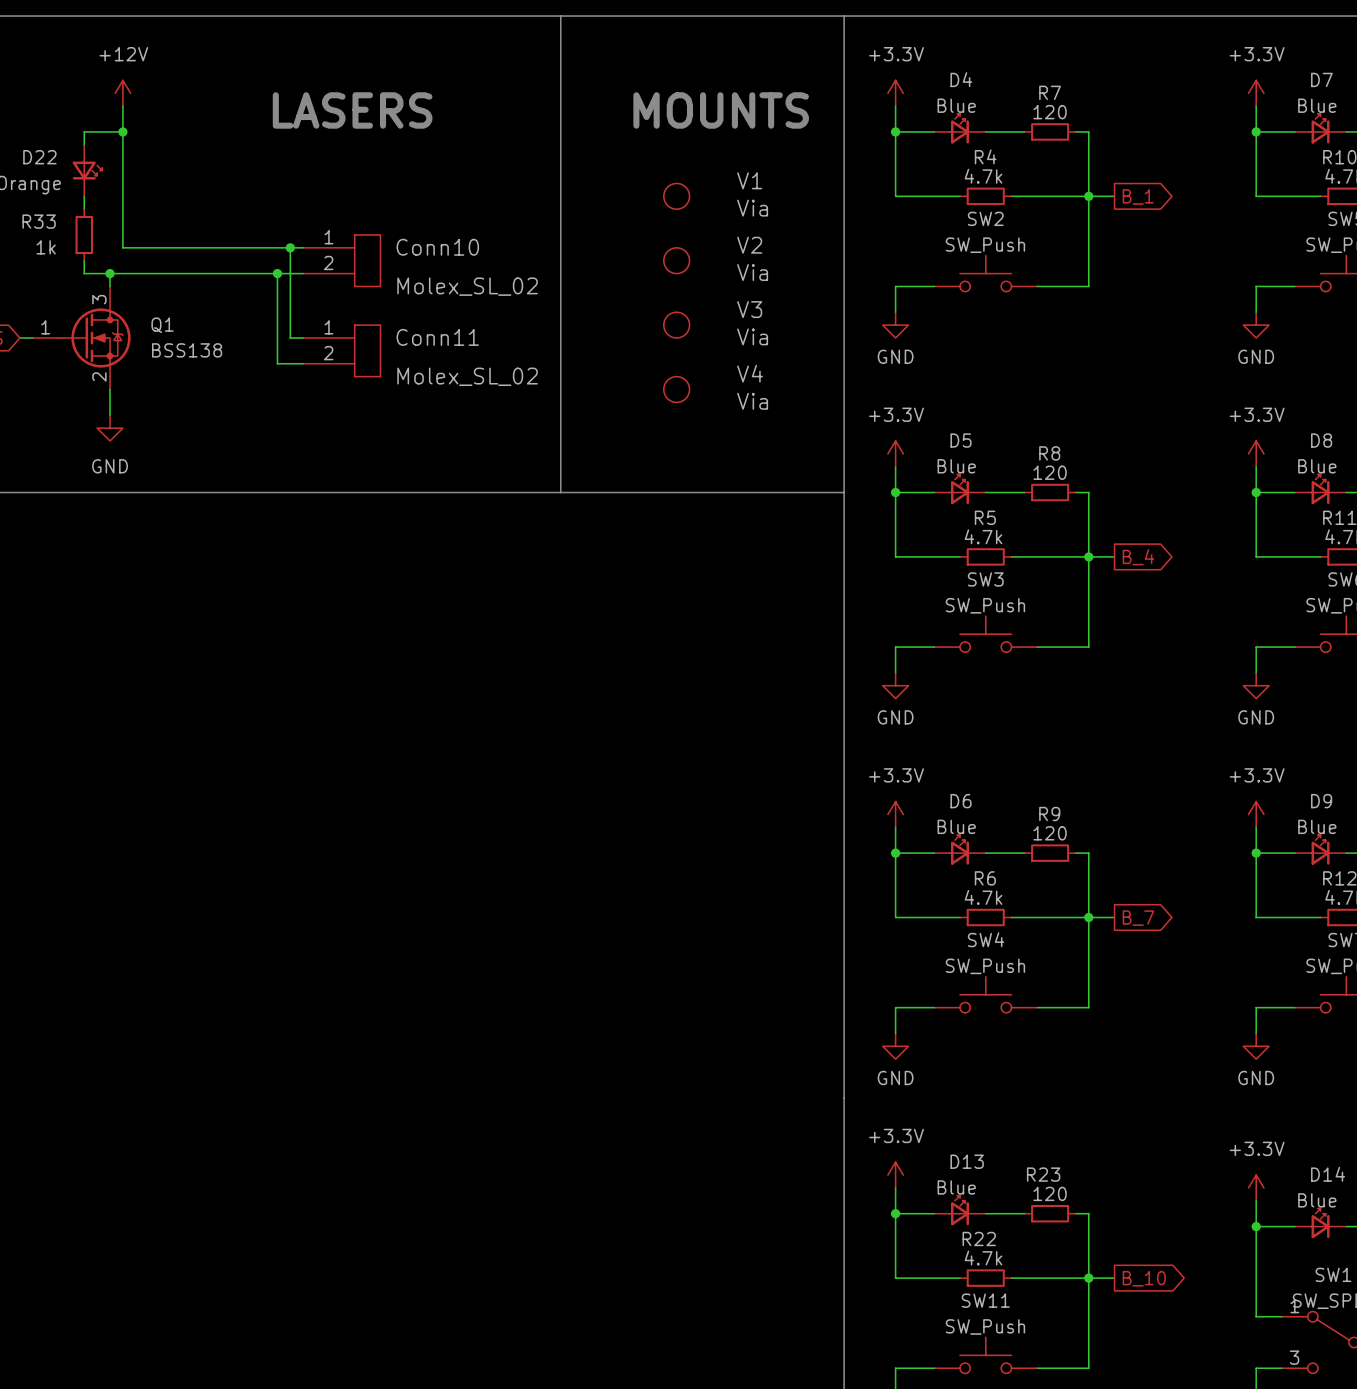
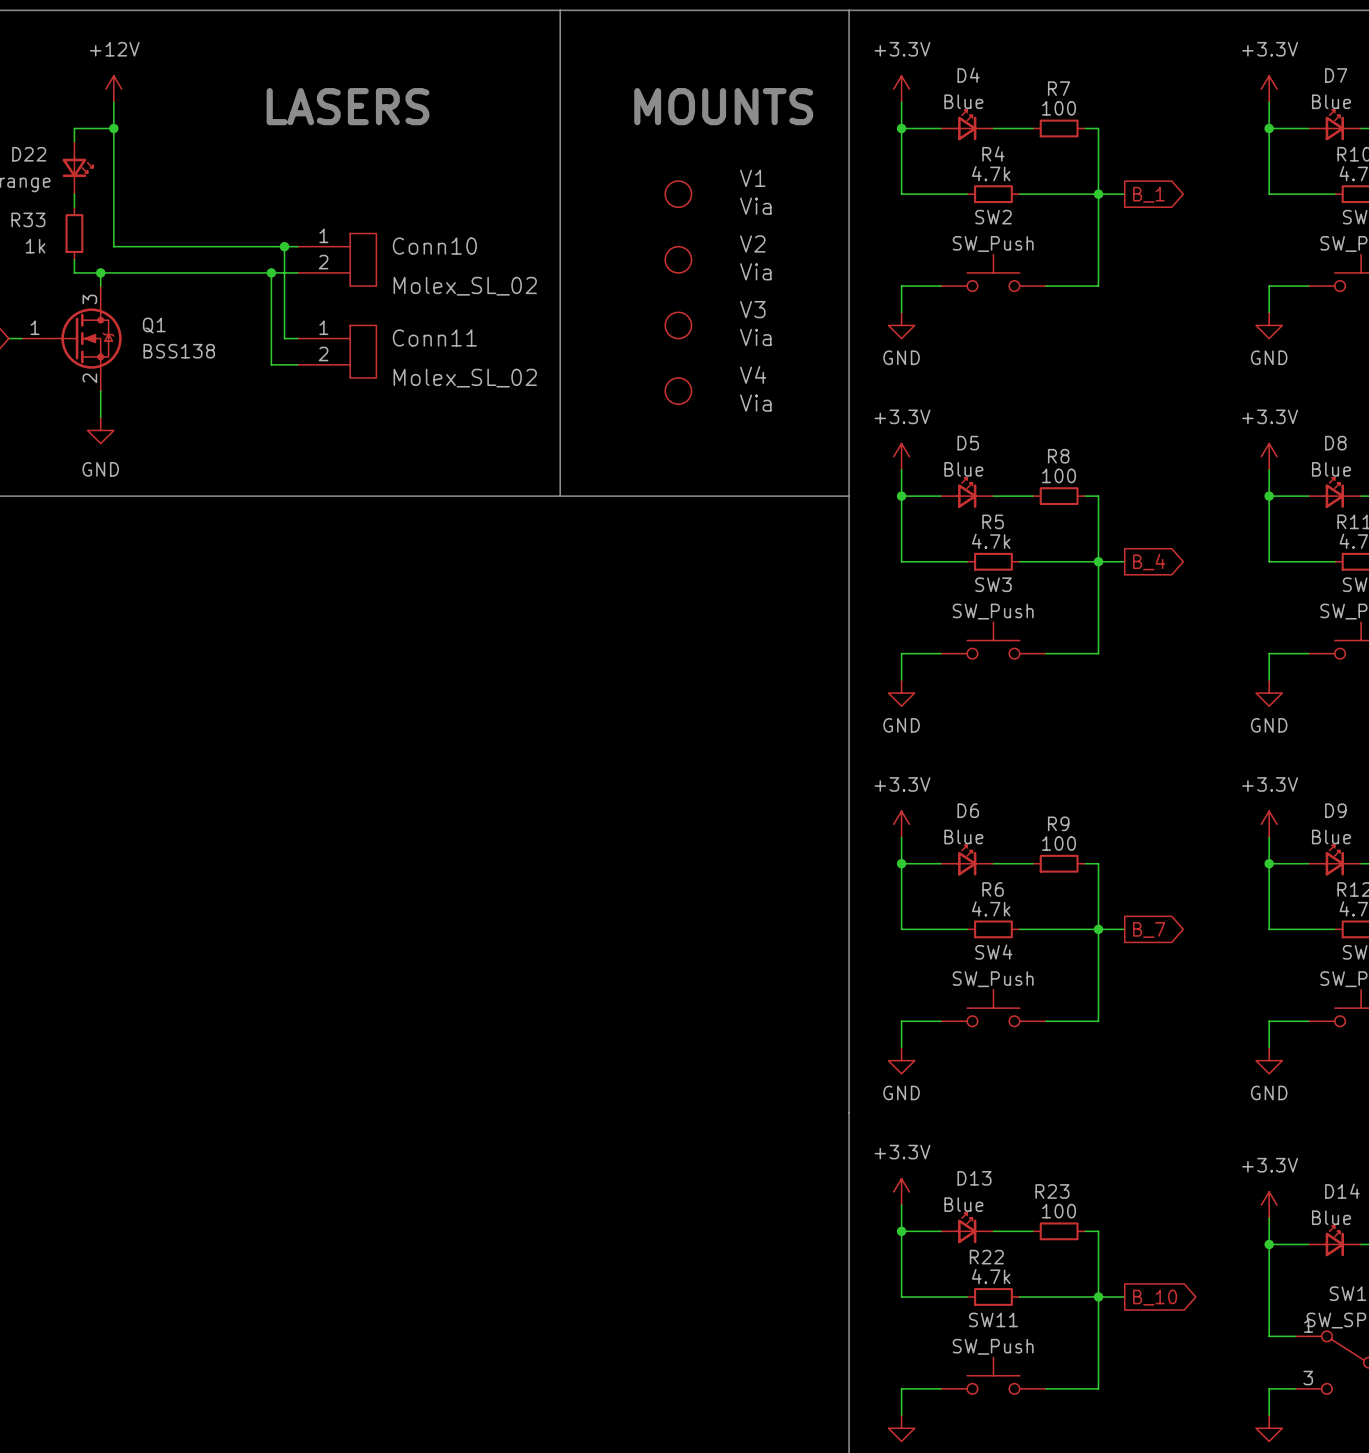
R7 value: 120 (1050, 112) -> 100 (1059, 108)
R8 value: 120 (1050, 472) -> 100 (1059, 475)
R9 value: 120 (1050, 833) -> 100 (1059, 843)
R23 value: 120 (1050, 1193) -> 100 (1059, 1211)

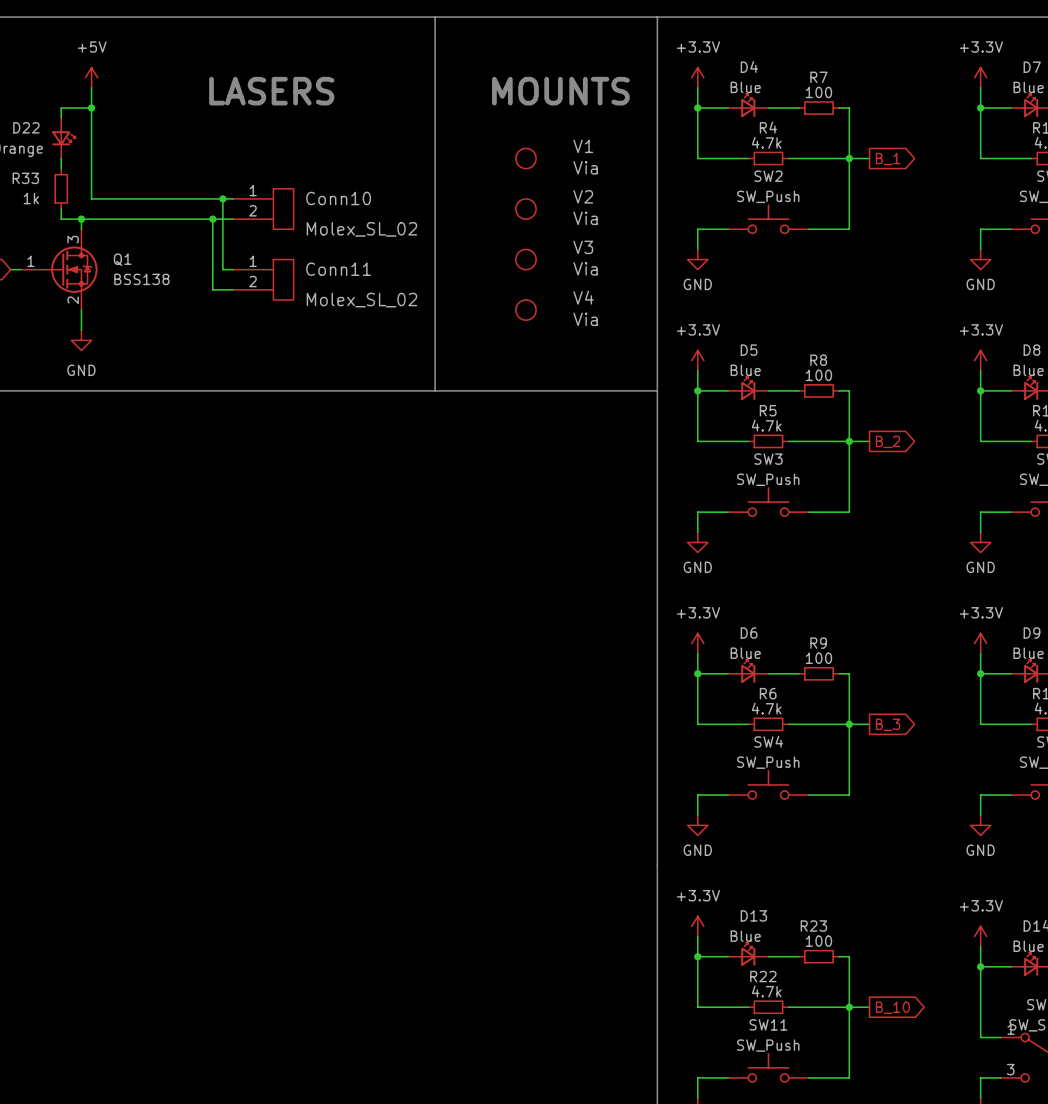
power symbol: +12V (113, 89) -> +5V (91, 77)
global label: B_4 (1149, 562) -> B_2 (888, 441)
global label: B_7 (1149, 930) -> B_3 (888, 724)

